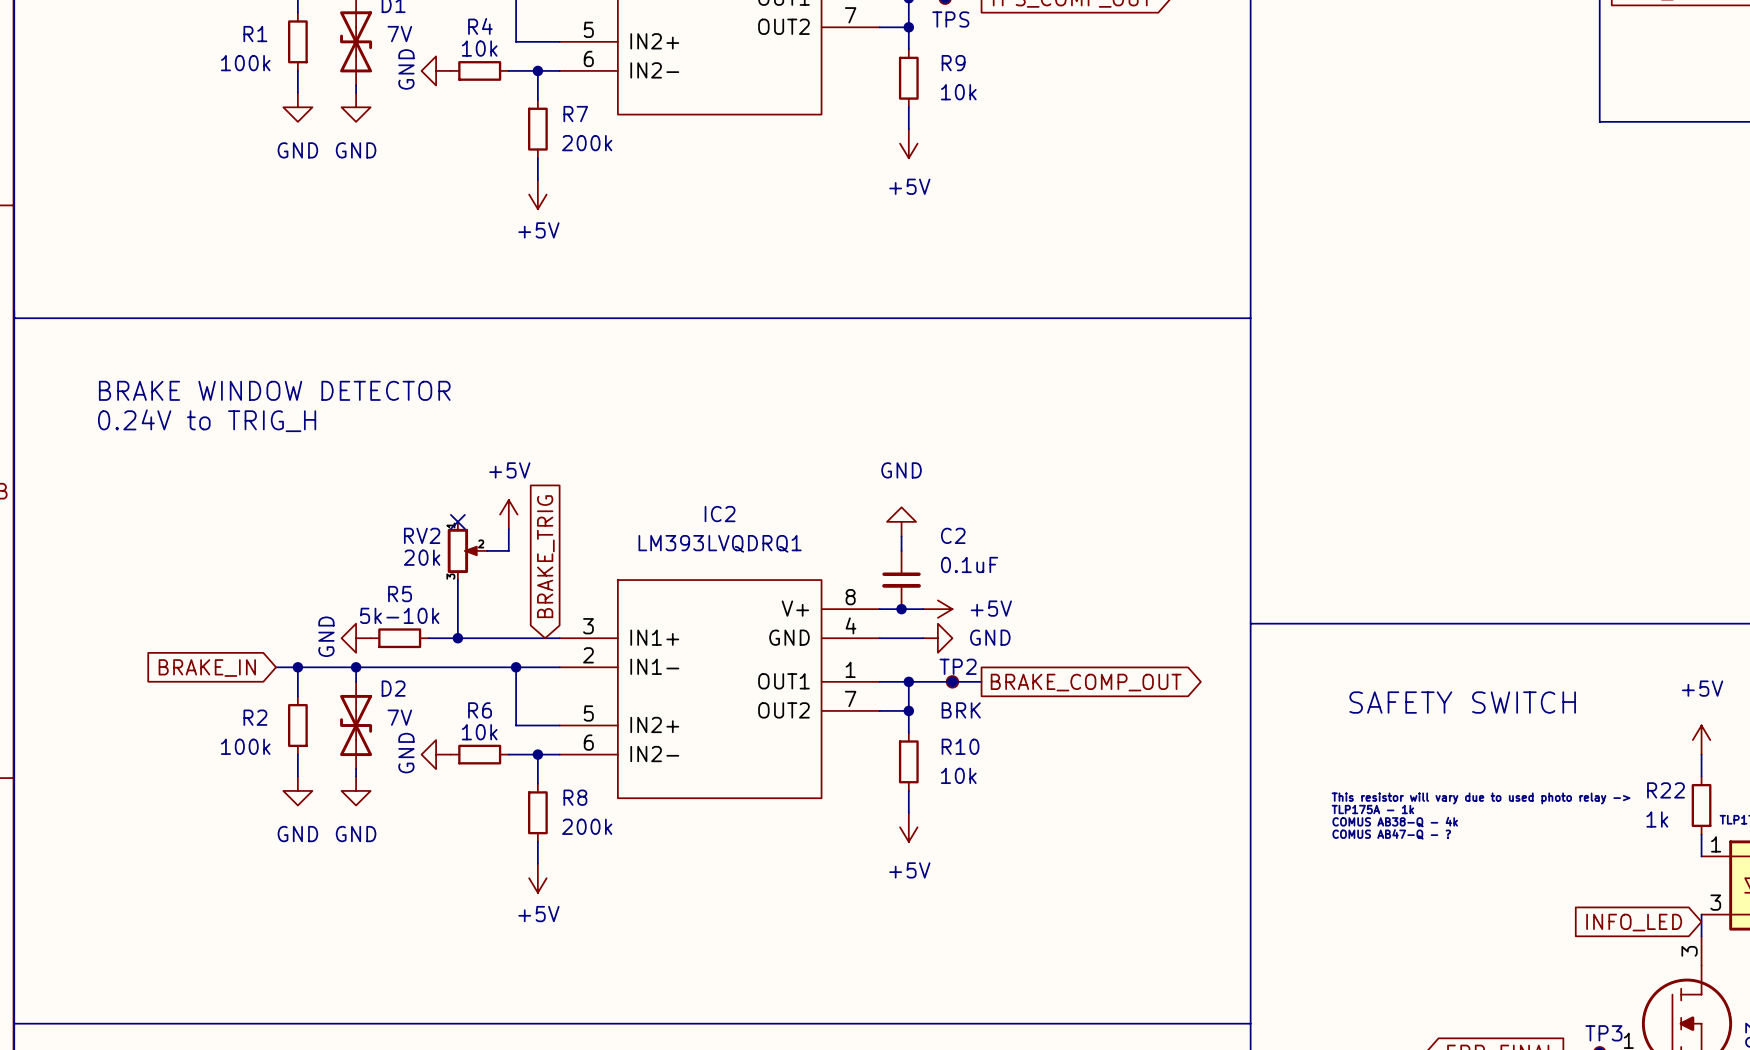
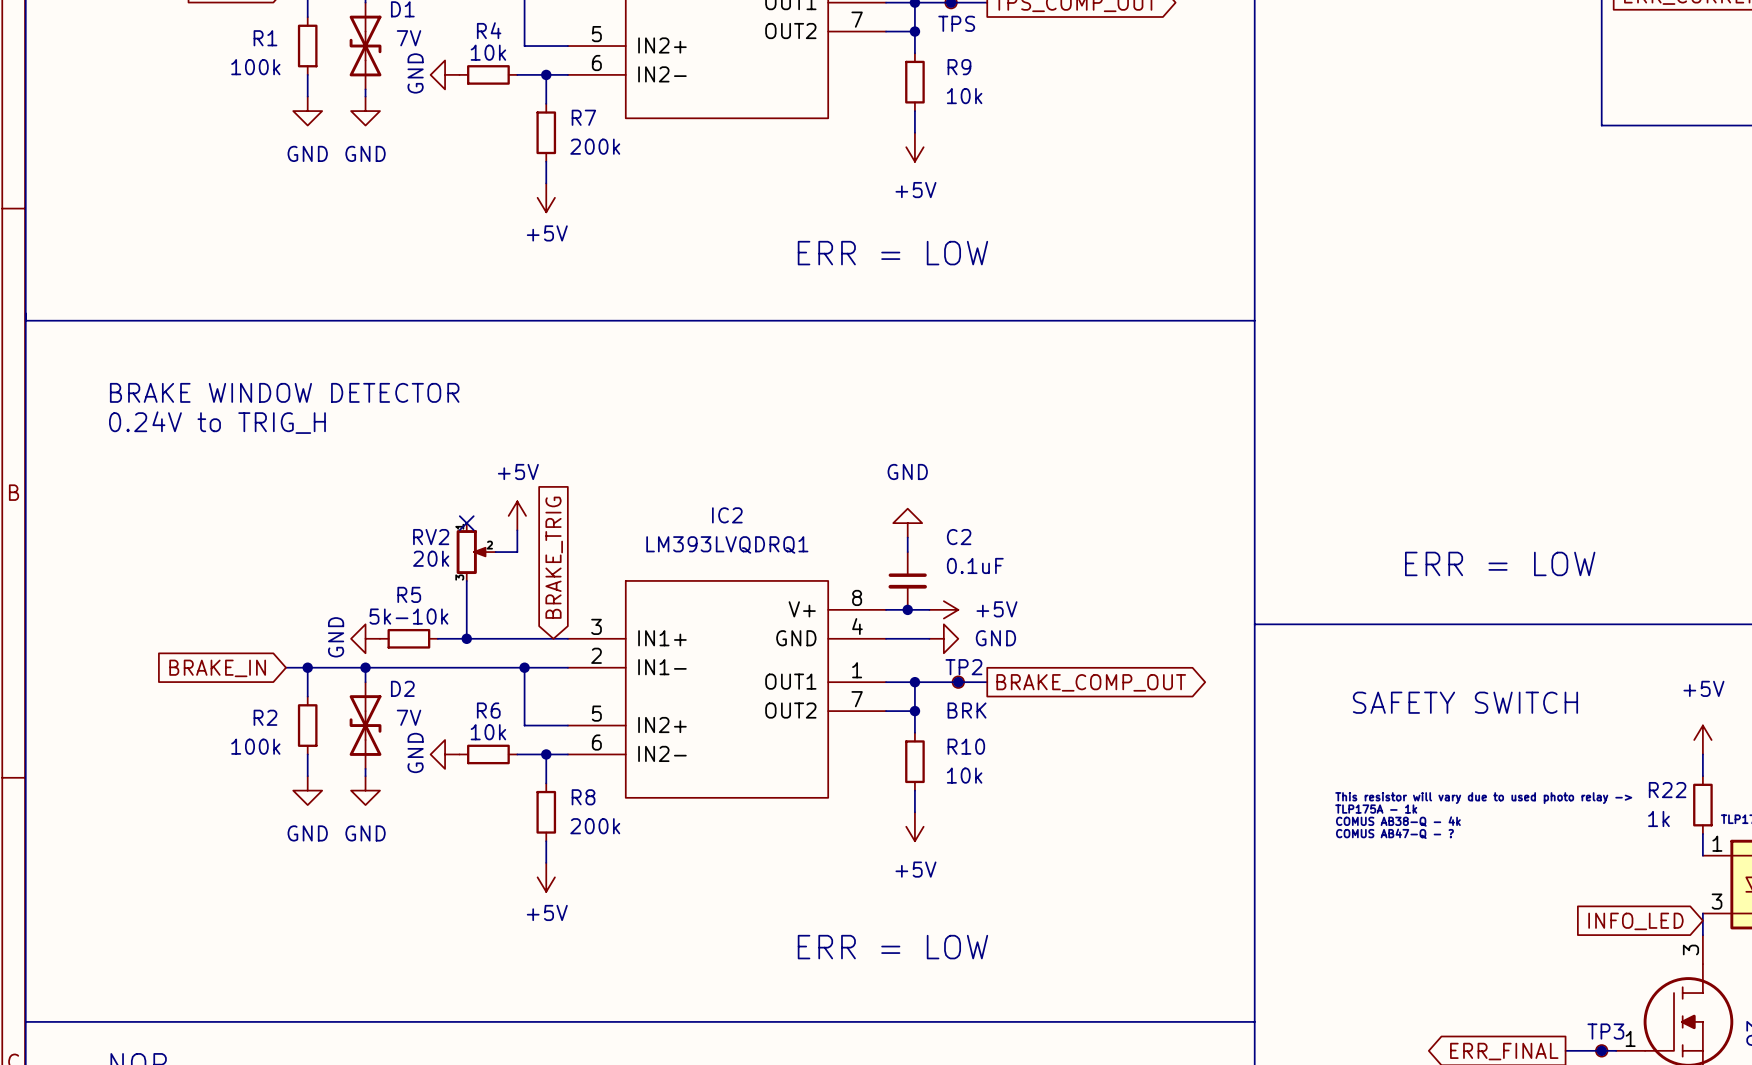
text: none -> ERR = LOW (892, 253)
text: none -> ERR = LOW (1500, 563)
text: none -> ERR = LOW (892, 947)

